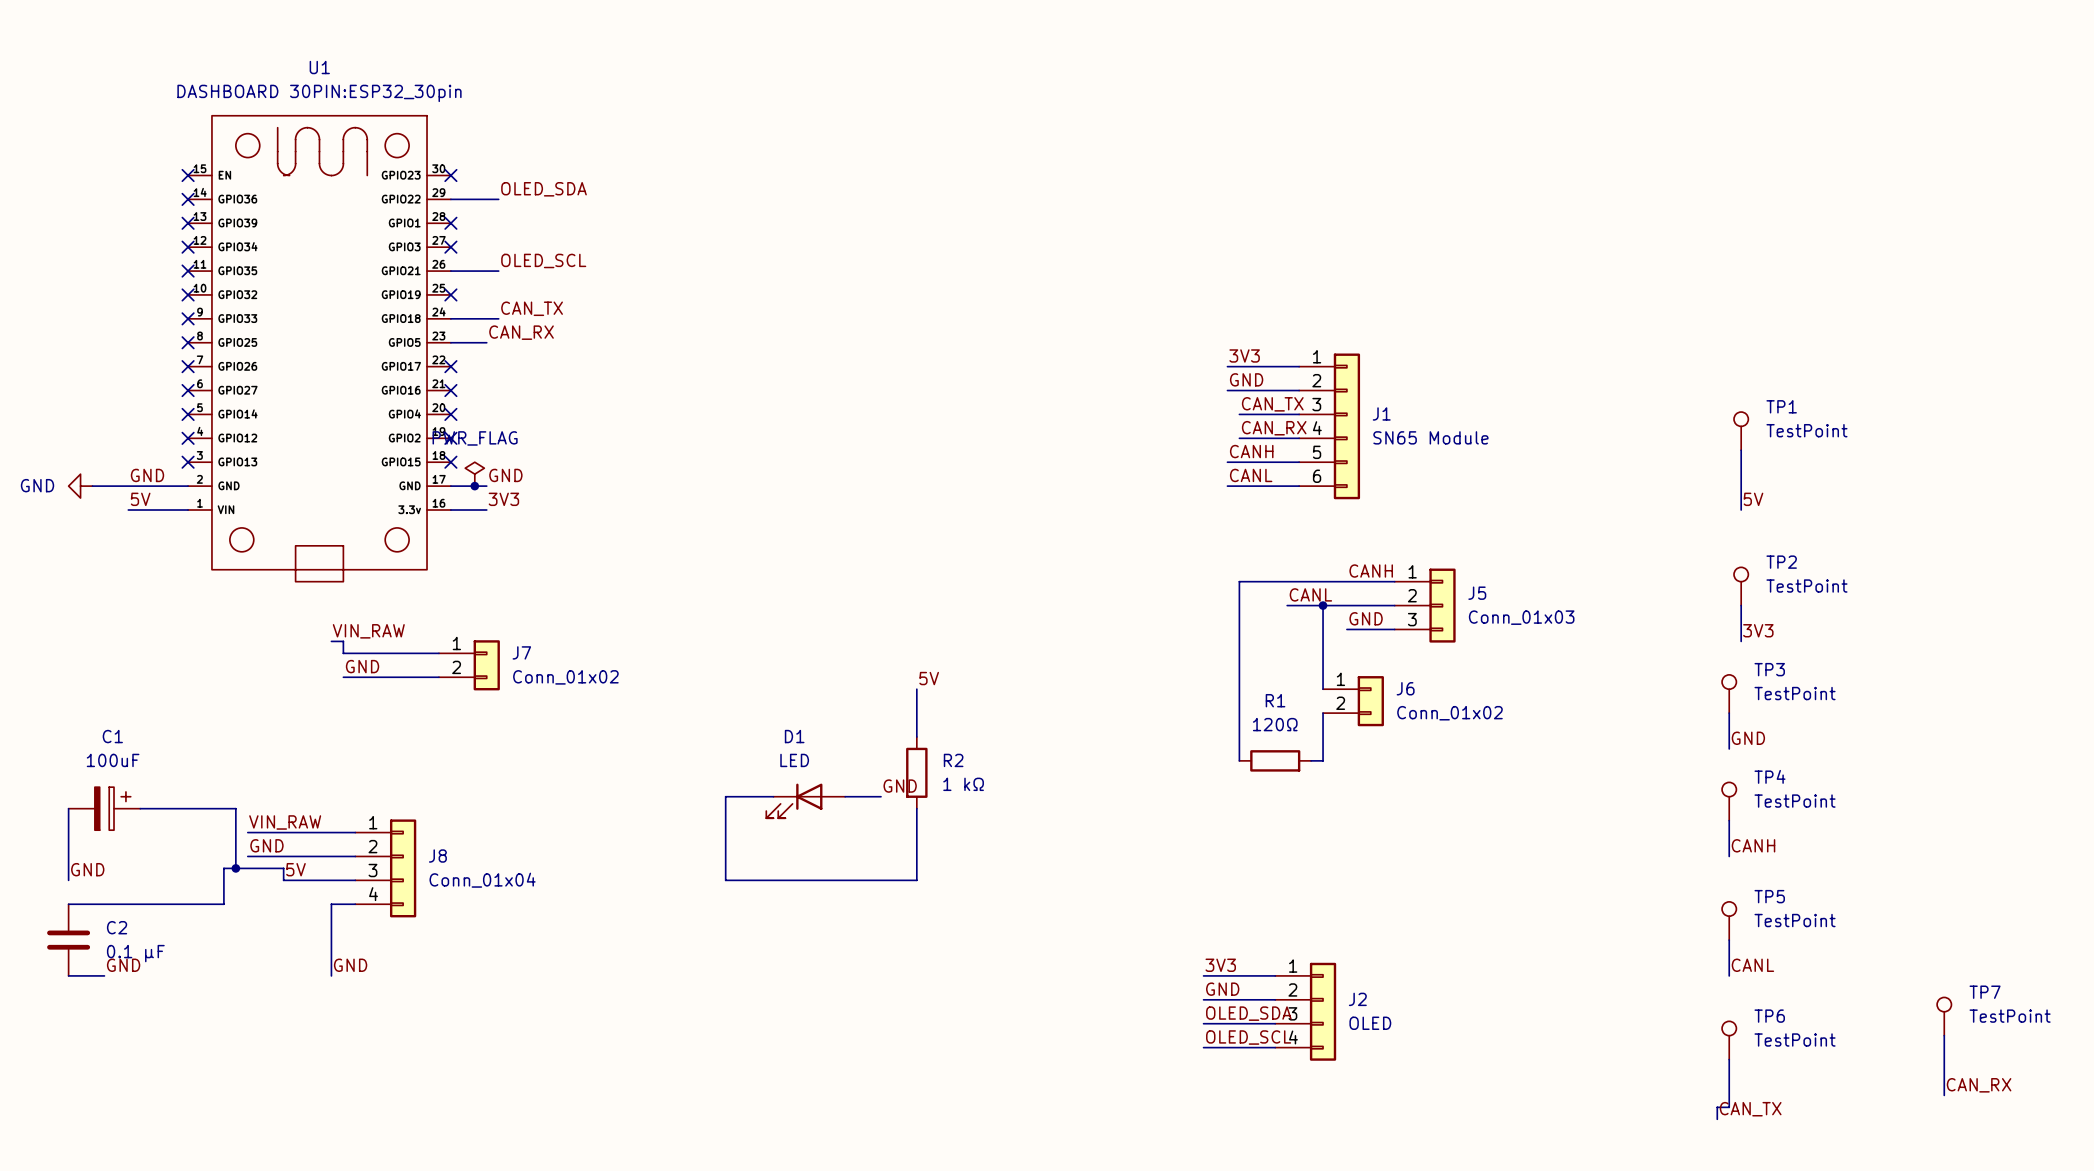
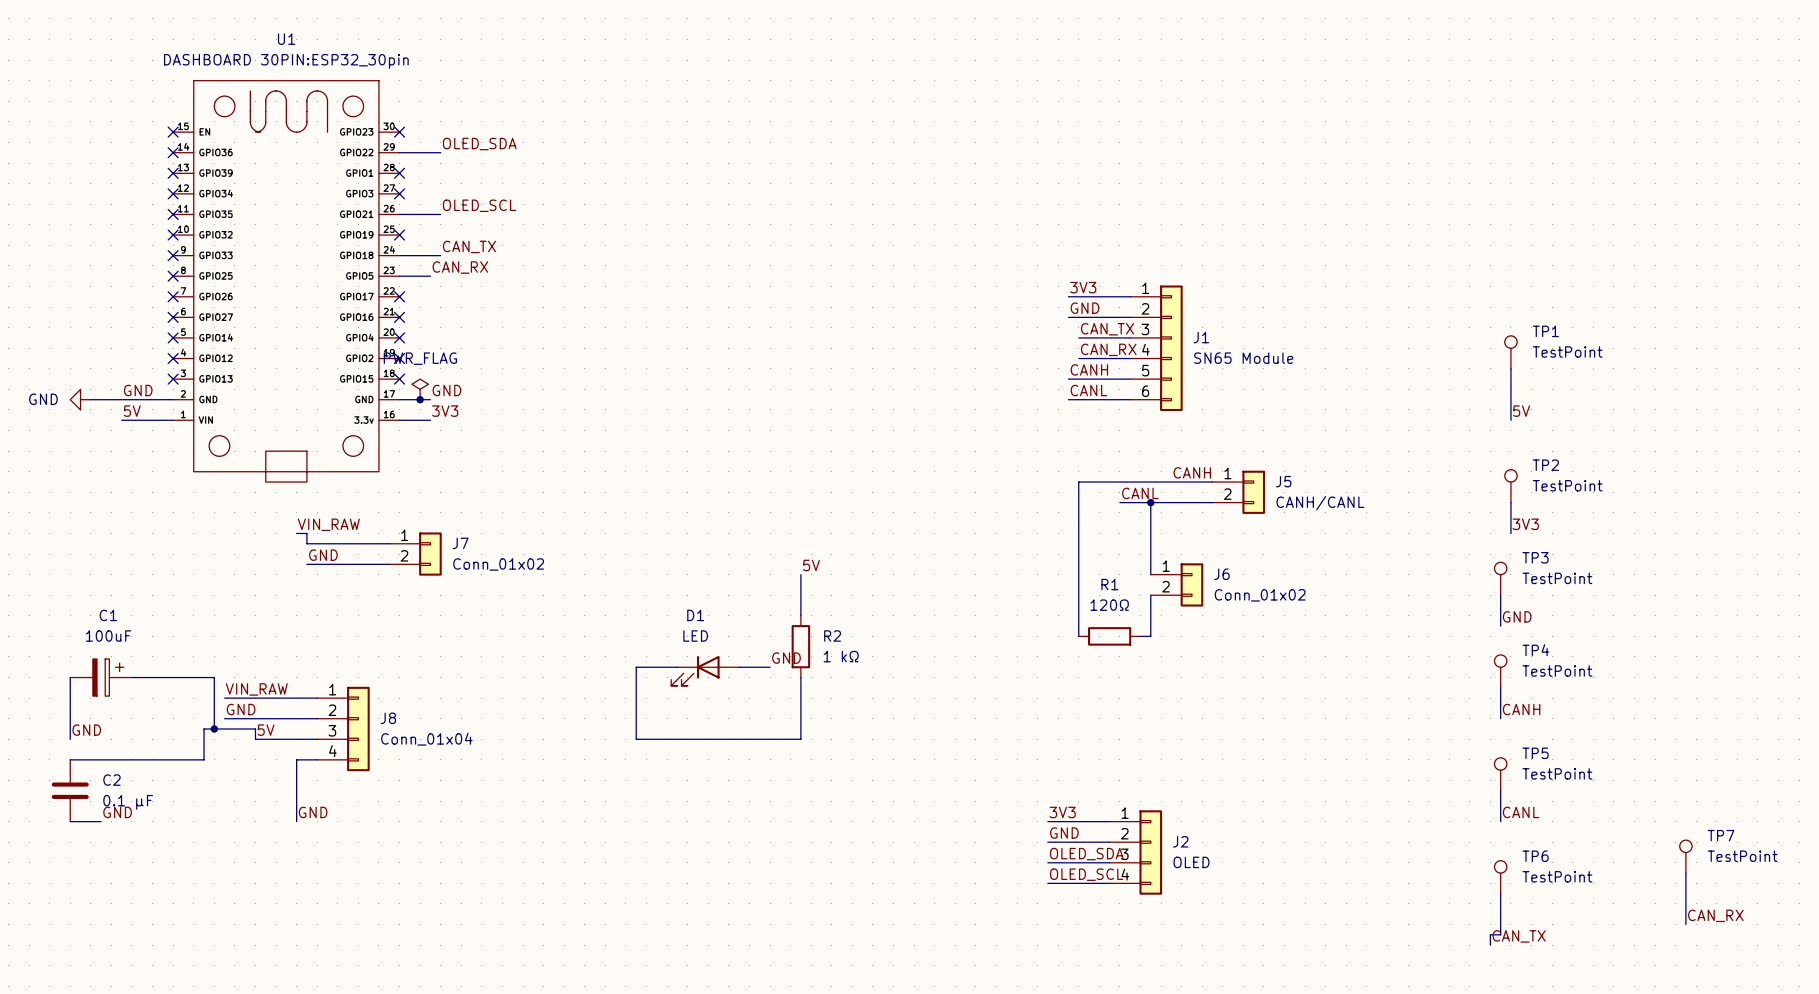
J5 symbol: [1394, 568, 1456, 643] -> [1212, 470, 1266, 514]
J5 value: Conn_01x03 (1521, 617) -> CANH/CANL (1320, 503)
label: GND (1366, 618) -> none
wire: (1346, 629) (1394, 629) -> none

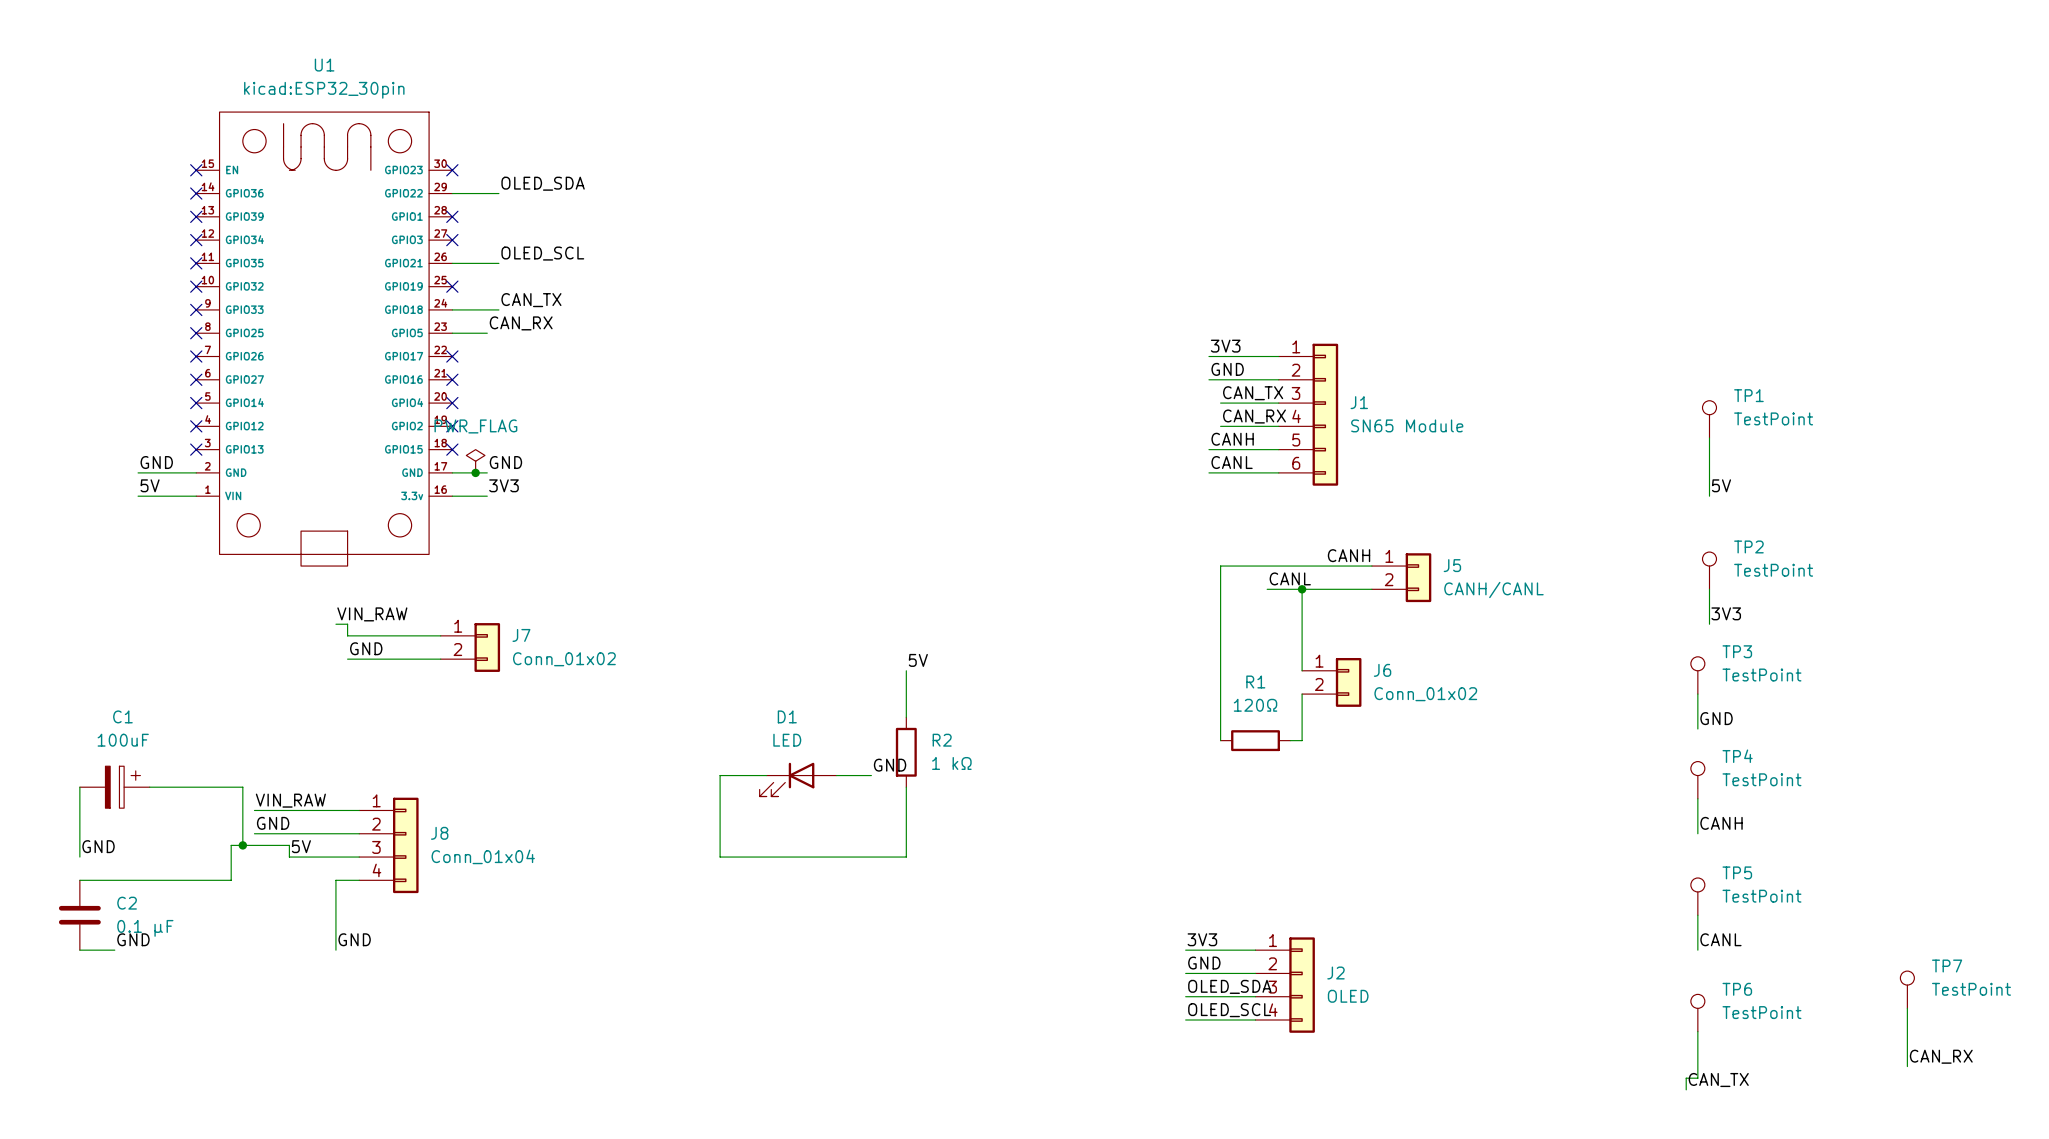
U1 text: DASHBOARD 30PIN:ESP32_30pin (286, 61) -> kicad:ESP32_30pin (324, 90)
power symbol: GND (80, 399) -> none
wire: (90, 399) (121, 399) -> none

